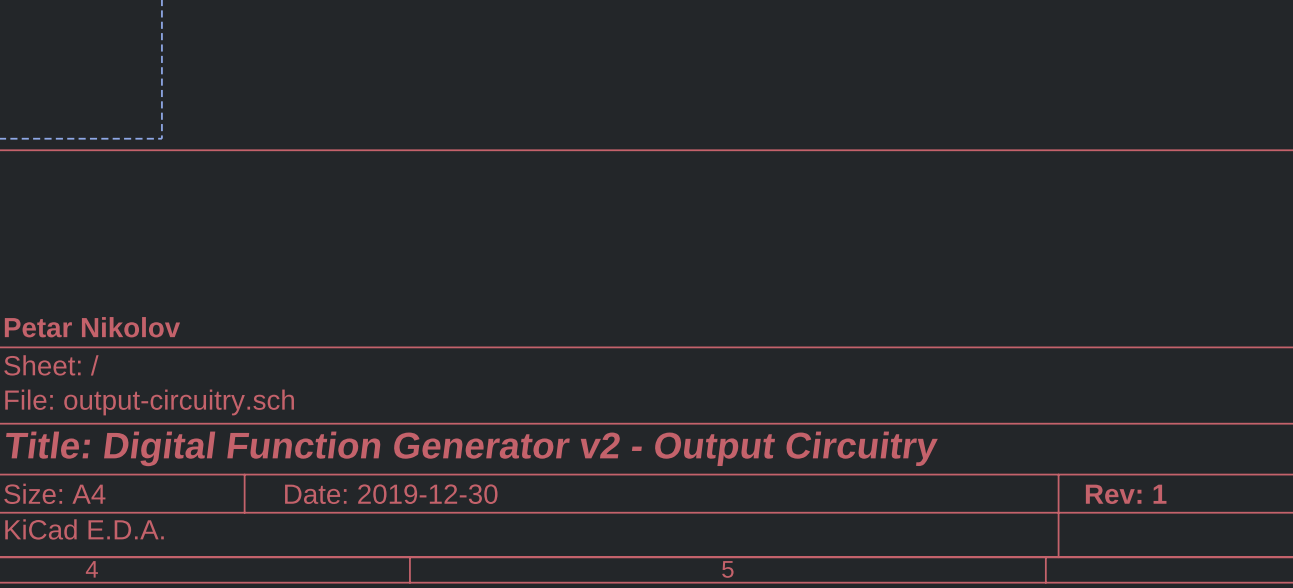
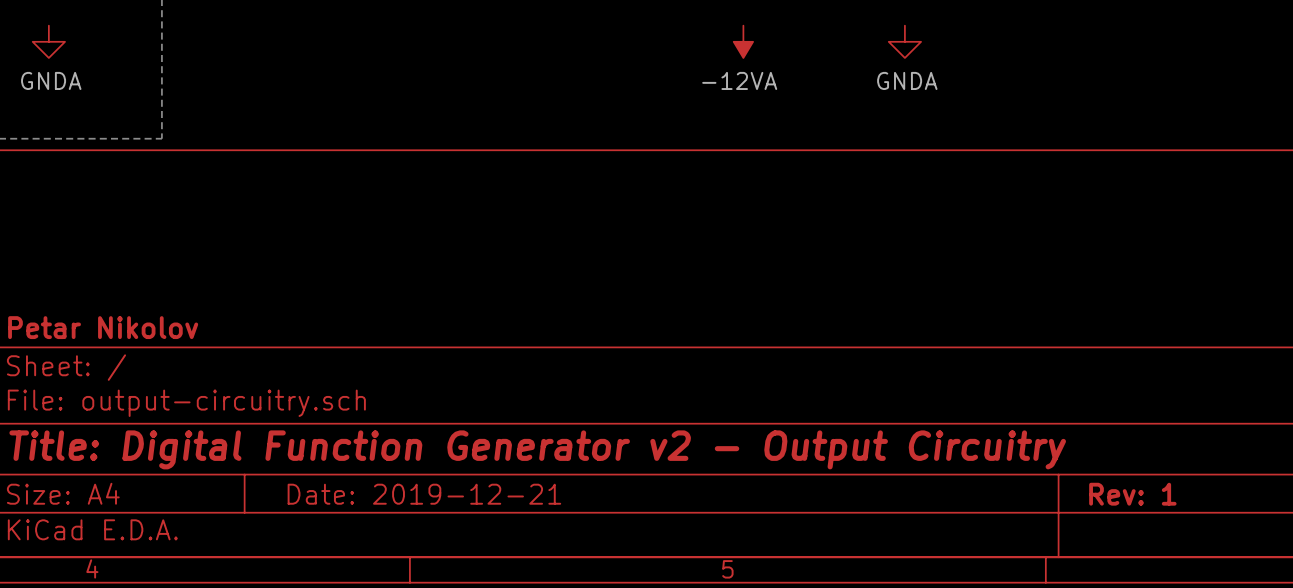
power symbol: none -> GNDA (48, 41)
power symbol: none -> -12VA (743, 41)
power symbol: none -> GNDA (904, 41)
title block: Date: 2019-12-30 (391, 494) -> Date: 2019-12-21 (424, 494)

